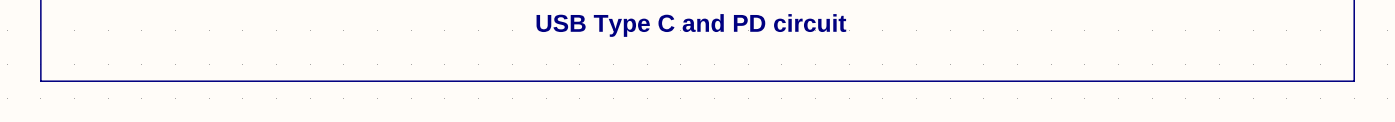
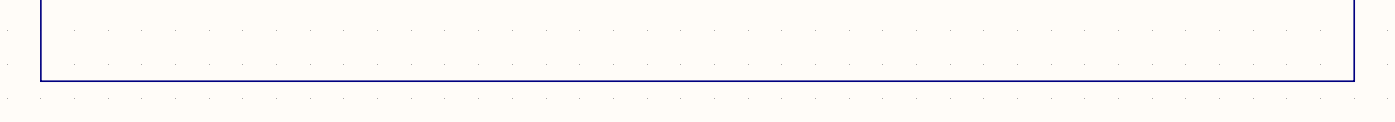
text: USB Type C and PD circuit (691, 25) -> none

